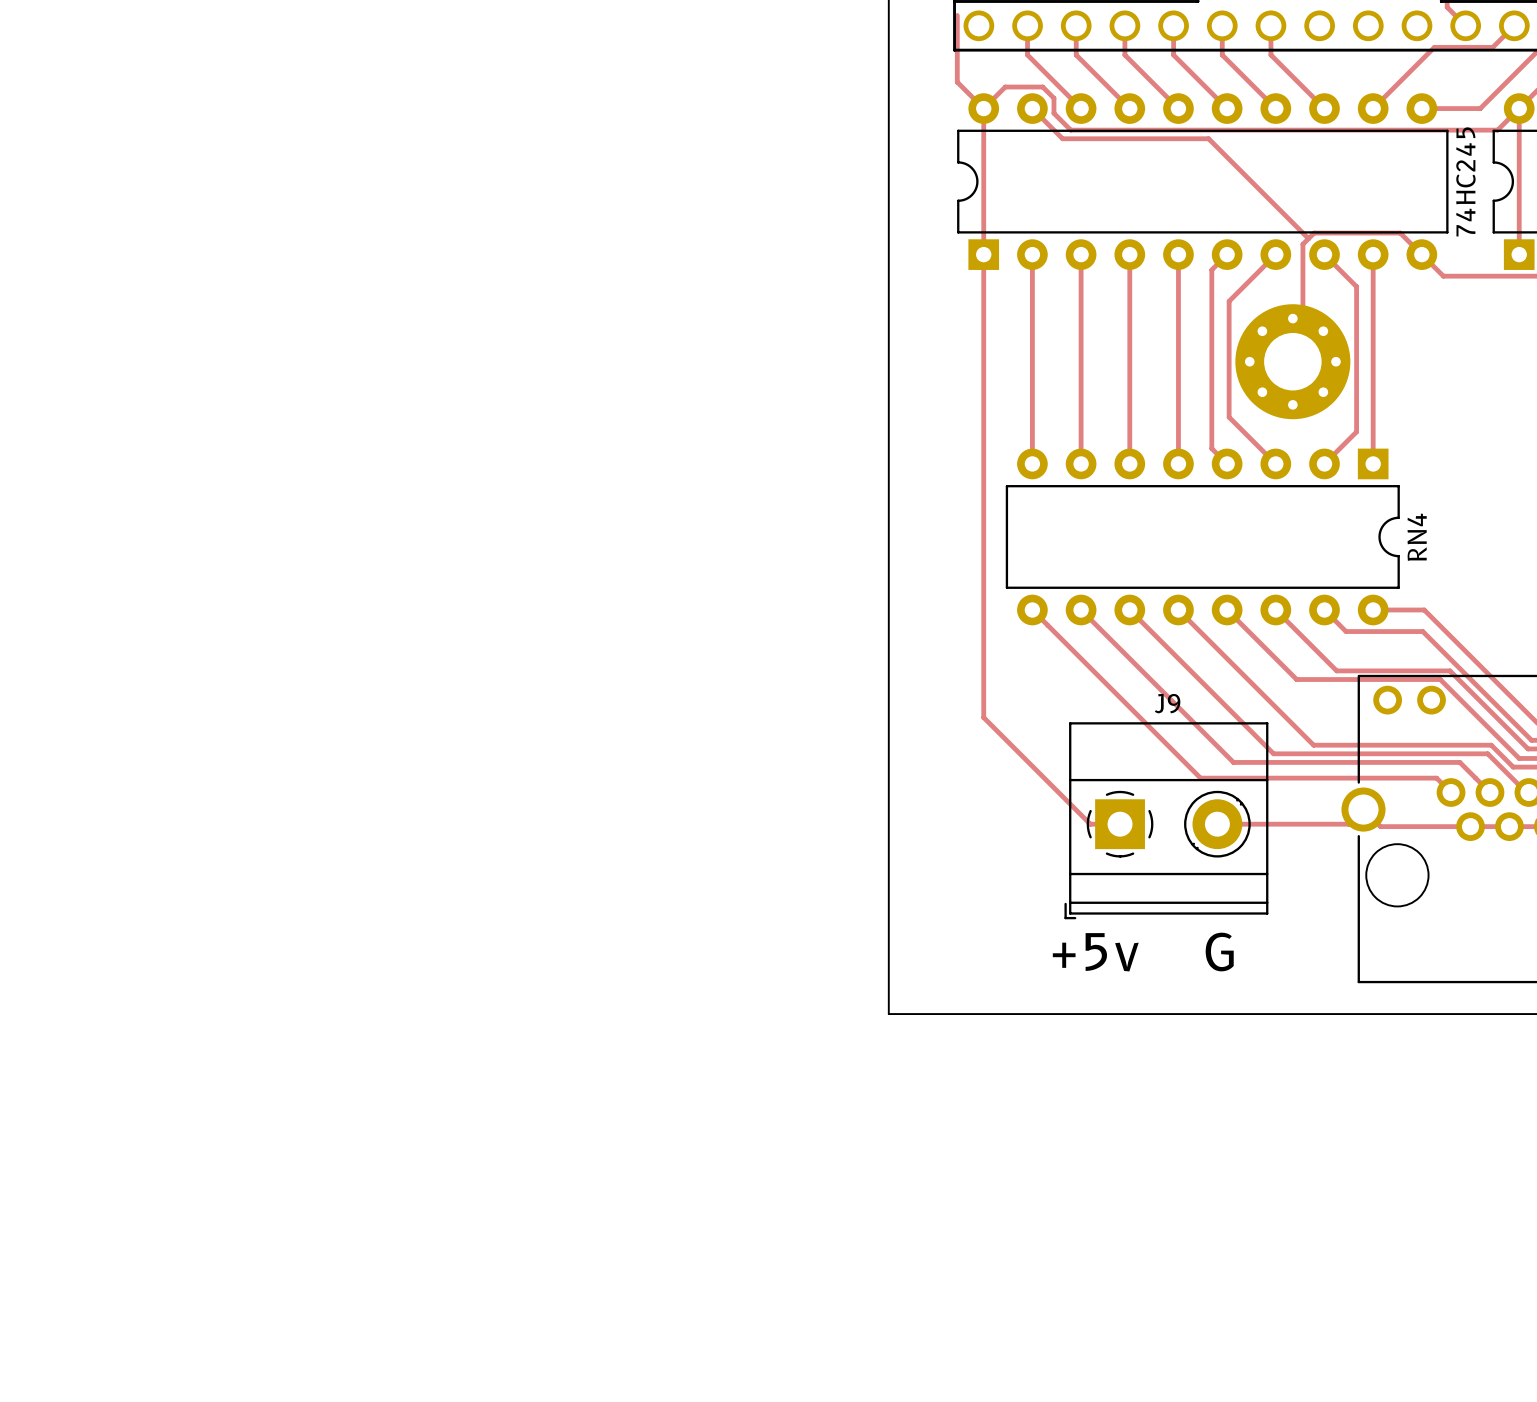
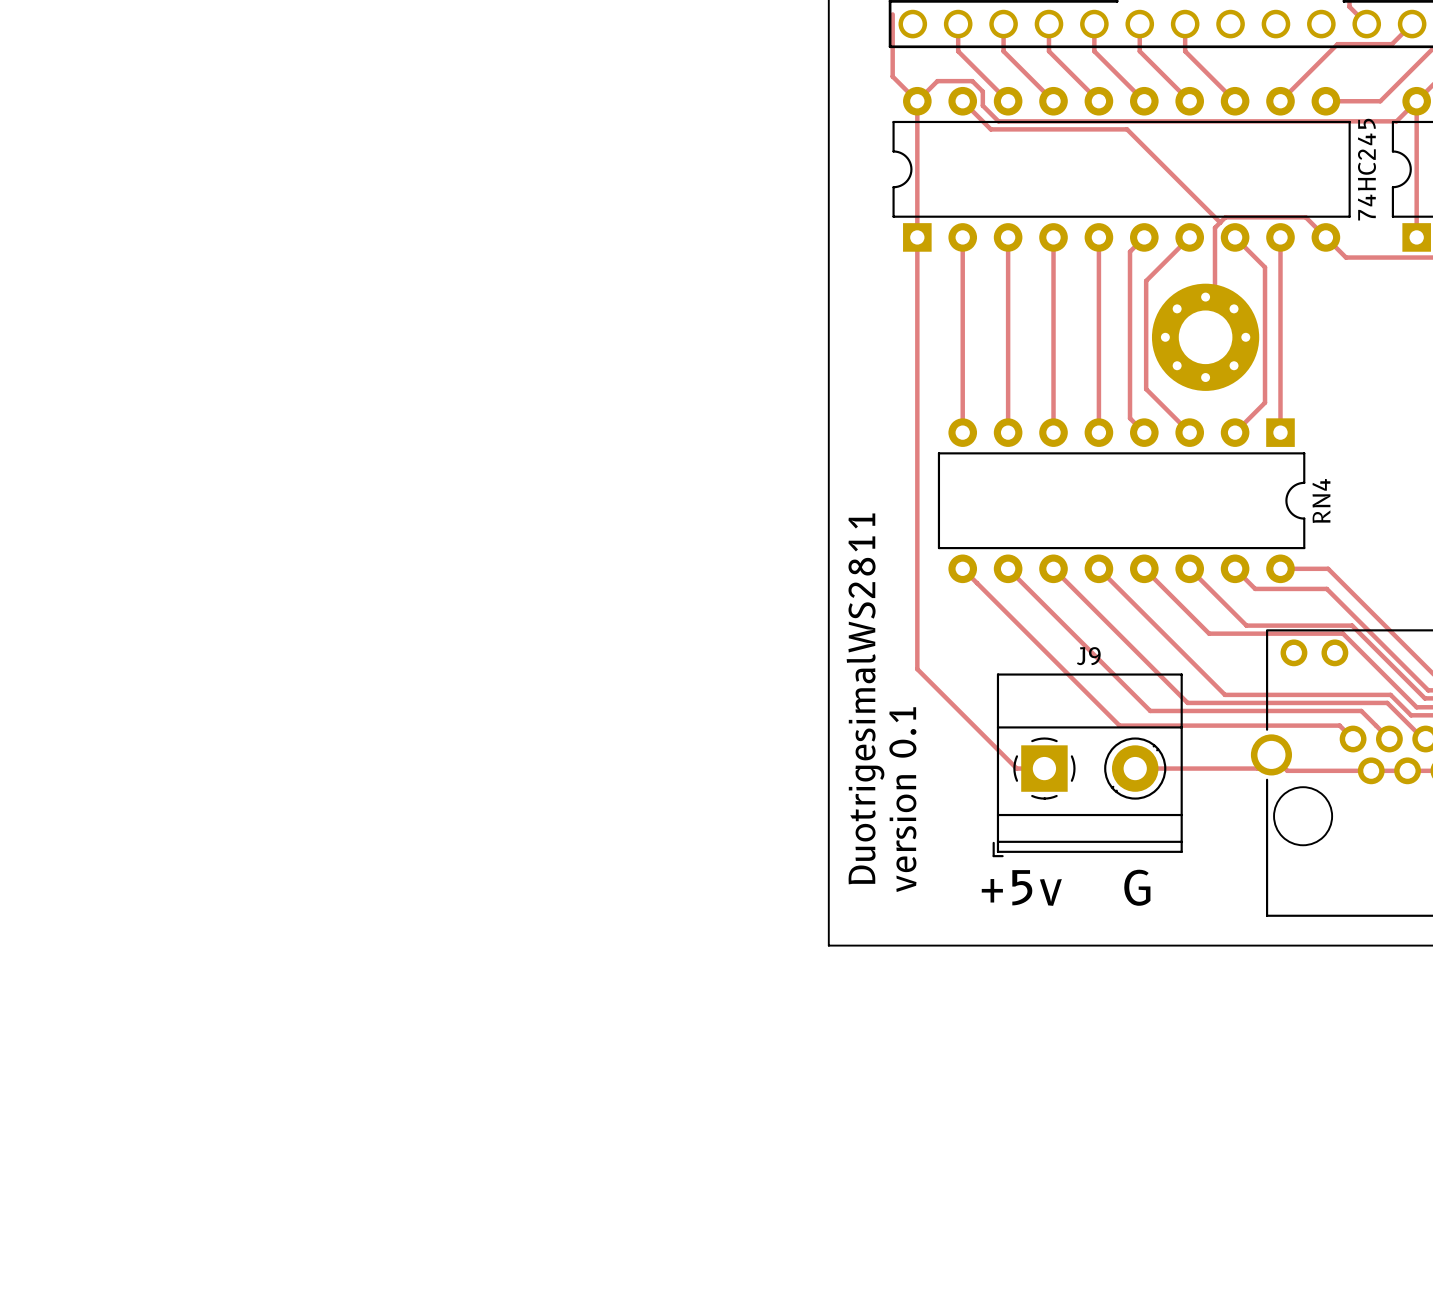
text: none -> DuotrigesimalWS2811 (865, 698)
text: none -> version 0.1 (902, 799)

